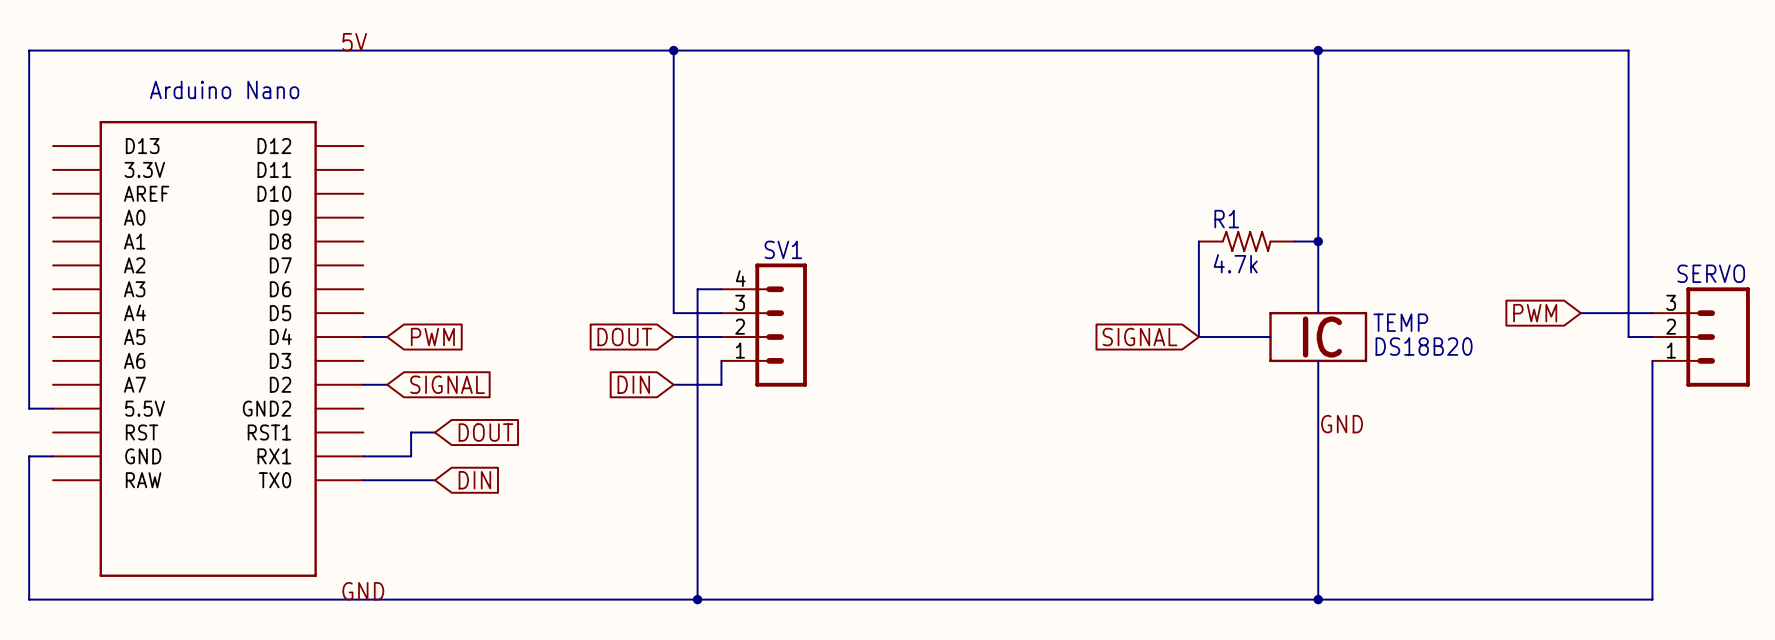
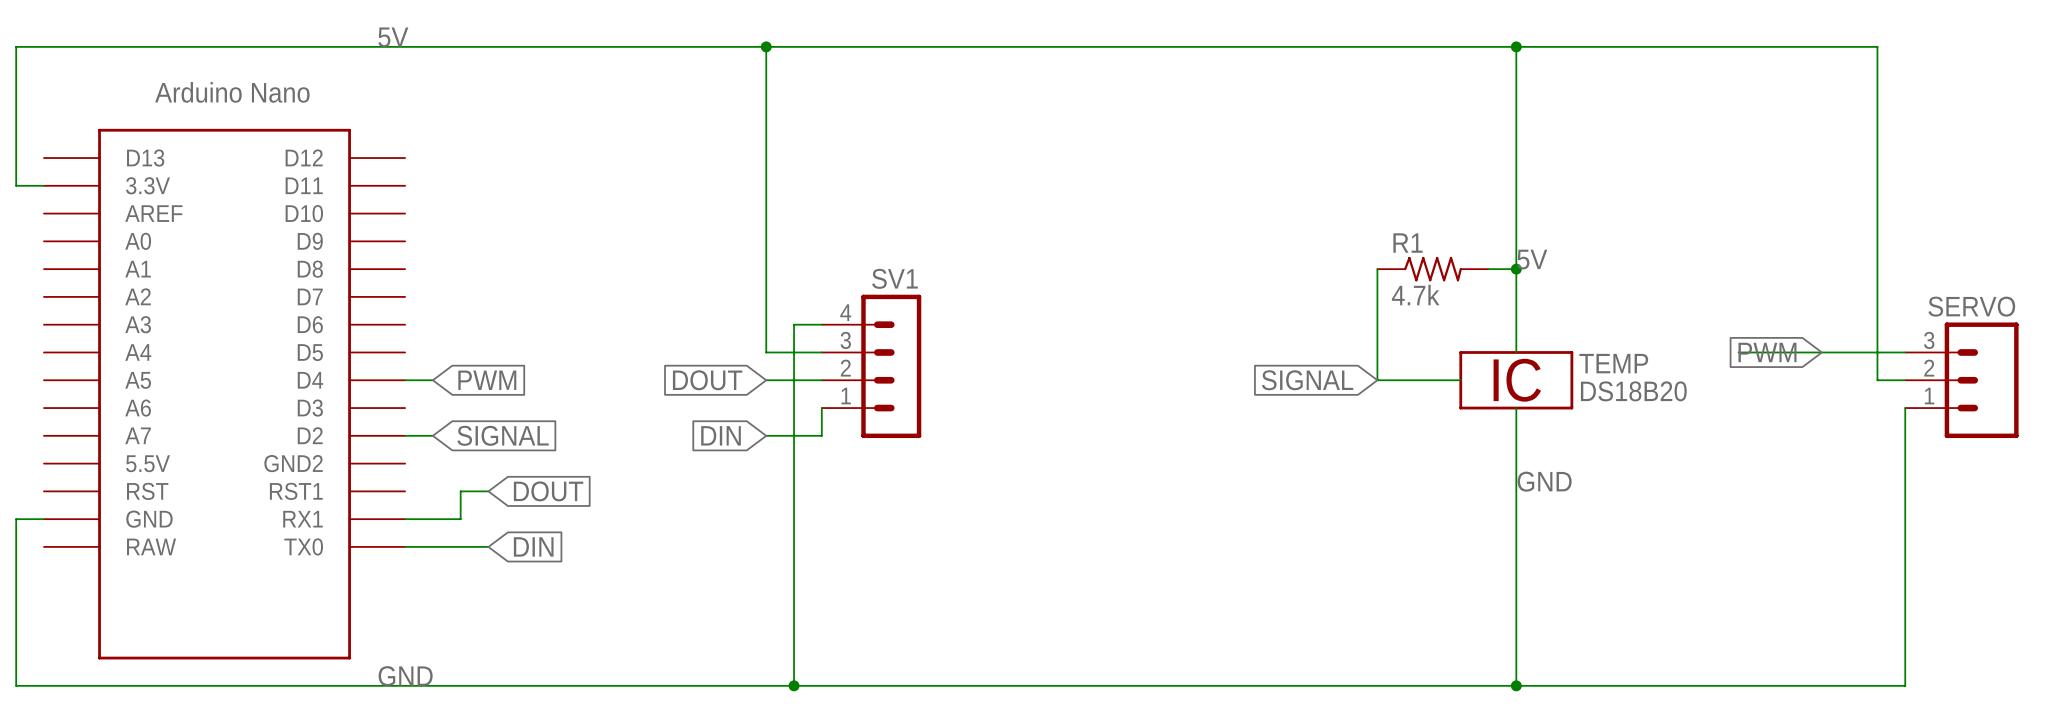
wire: (29, 169) (29, 408) (53, 408) -> (16, 185) (43, 185)
label: none -> 5V (1532, 259)
wire: none -> (1738, 352) (1821, 352)

